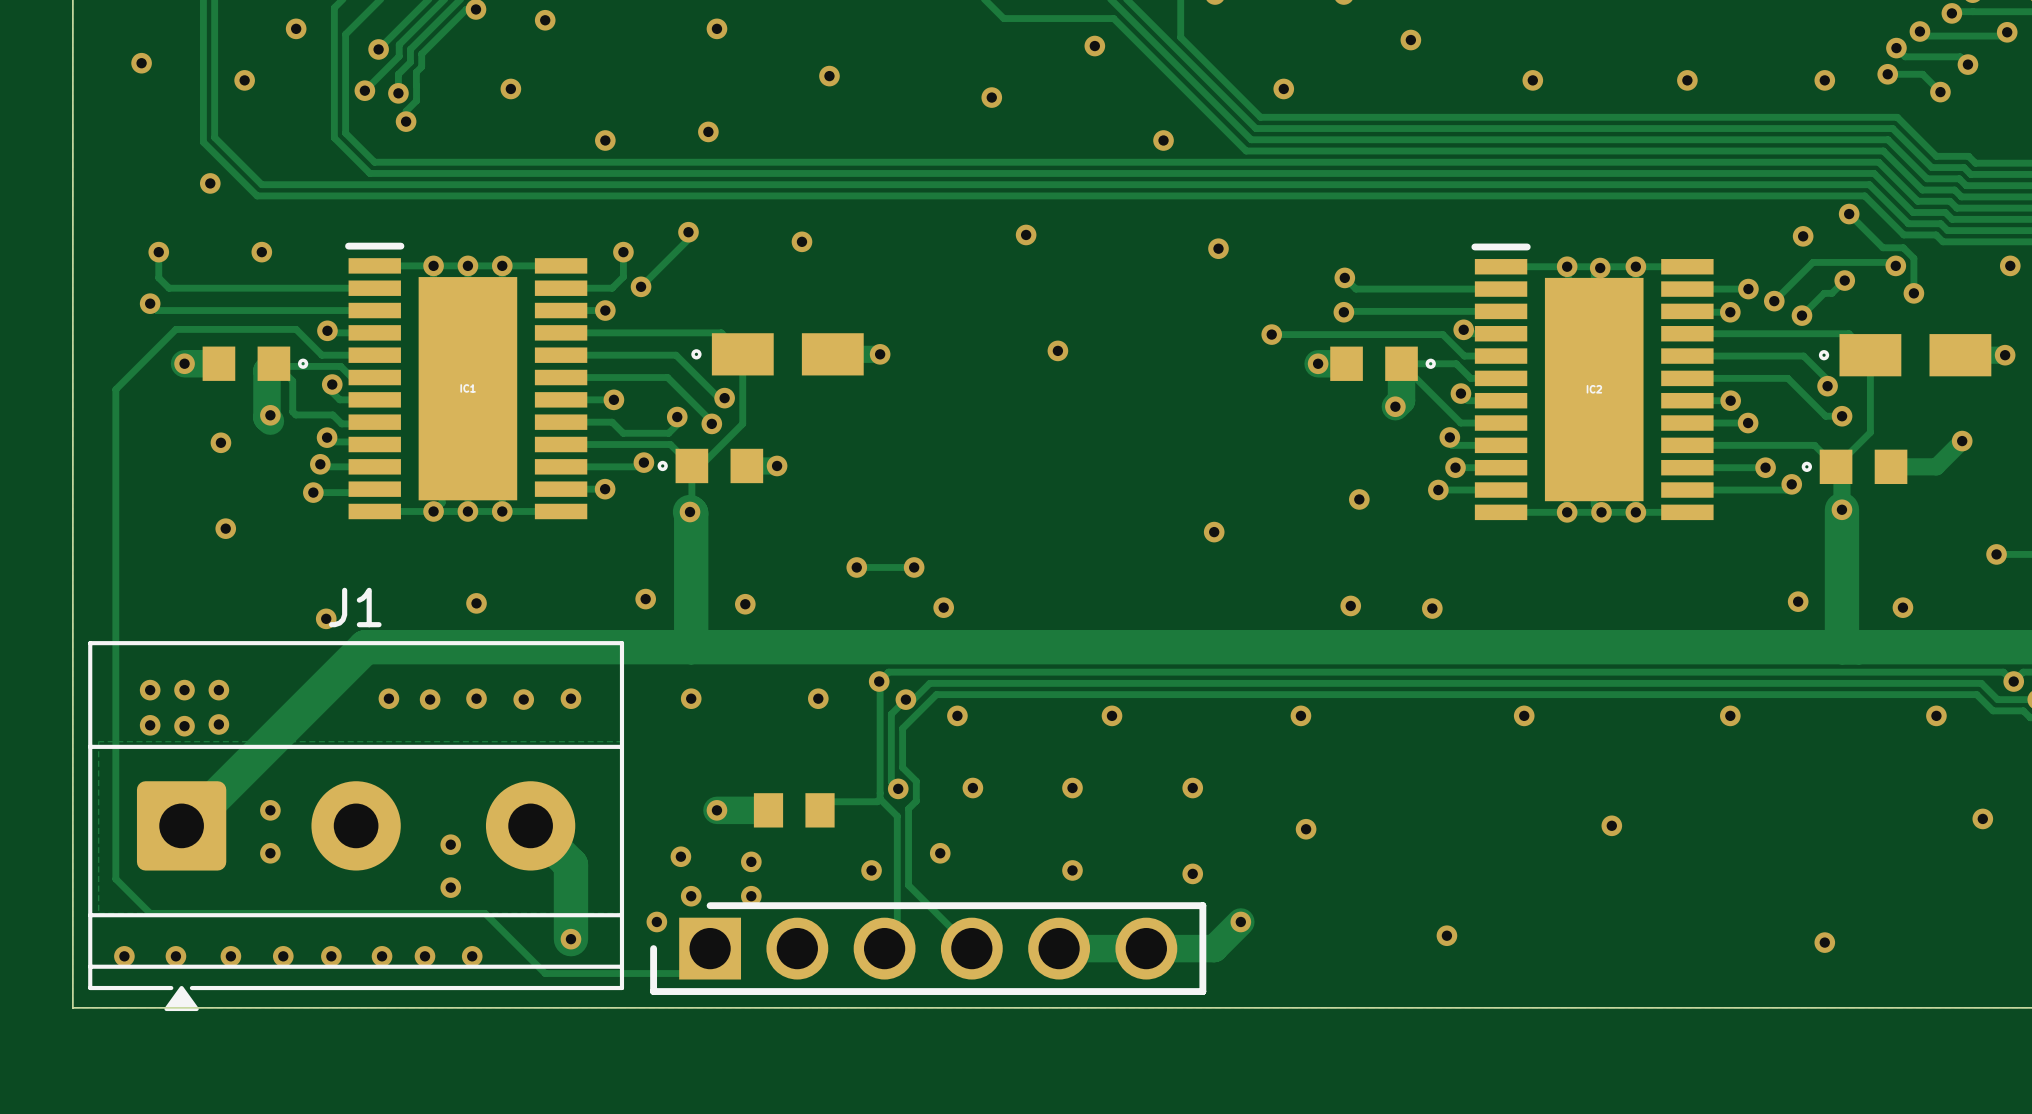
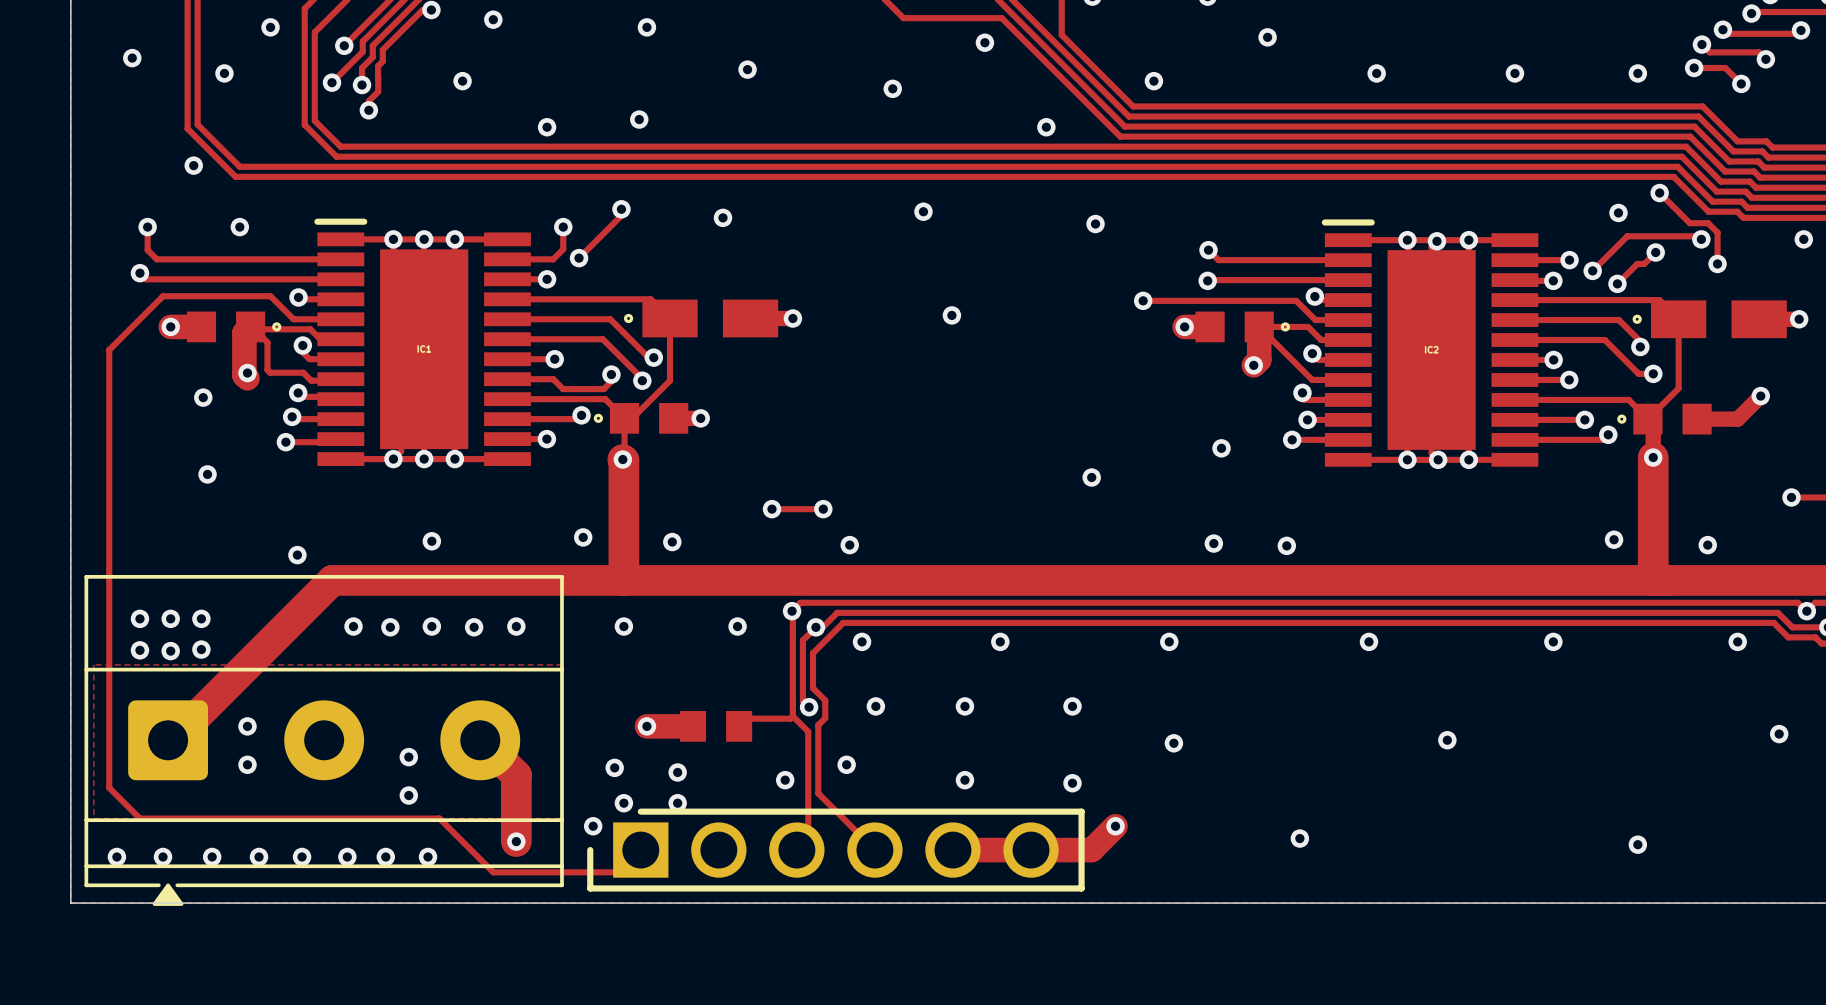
J1 name: J1 (355, 607) -> none

